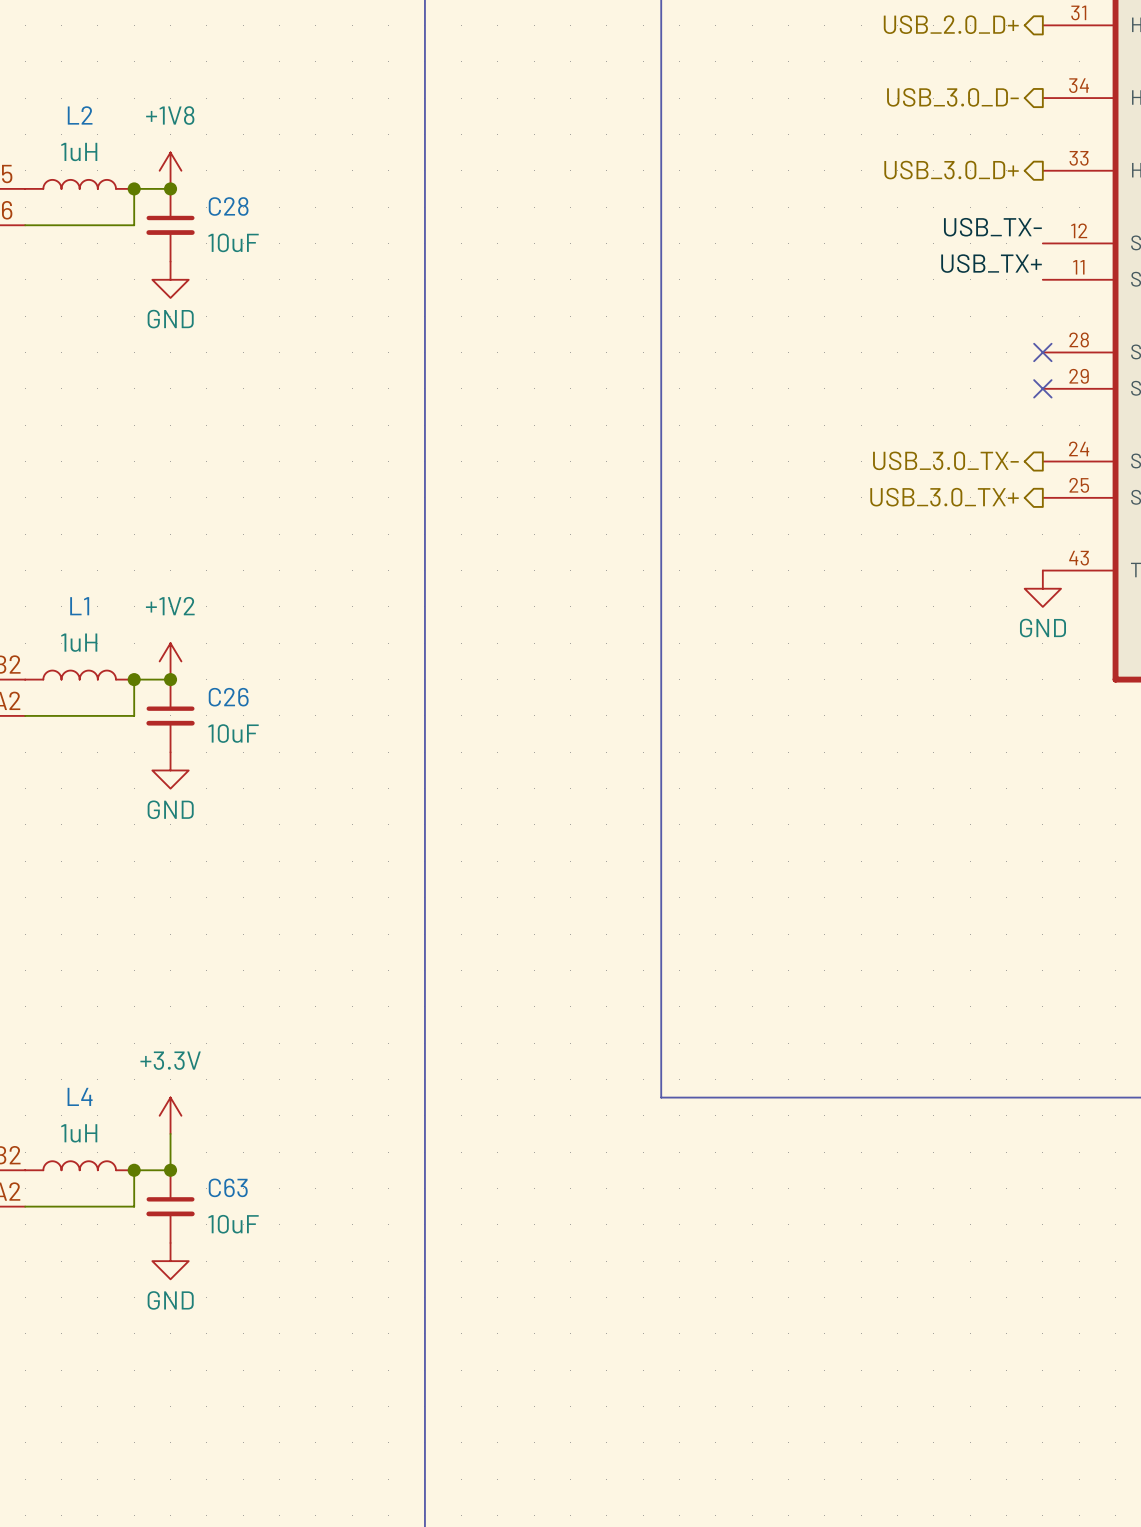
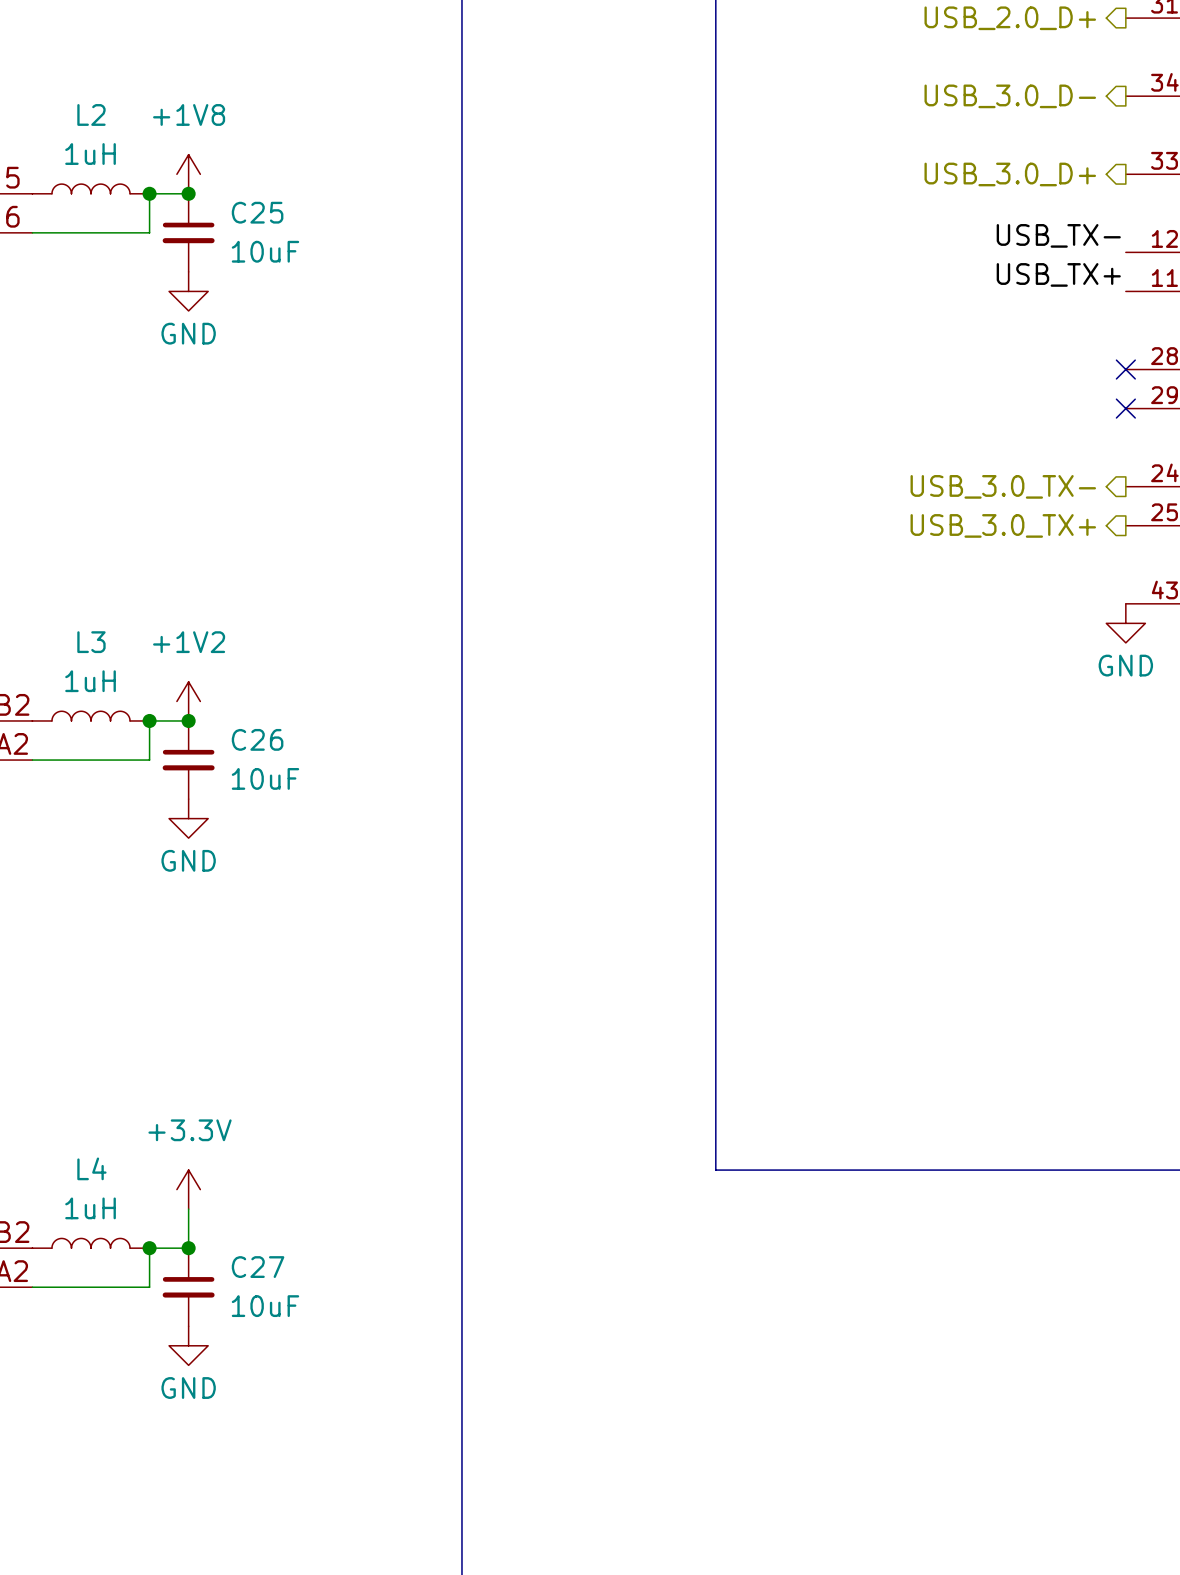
C28 name: C28 (228, 206) -> C25 (257, 212)
L1 name: L1 (79, 606) -> L3 (91, 642)
C63 name: C63 (228, 1187) -> C27 (258, 1267)

